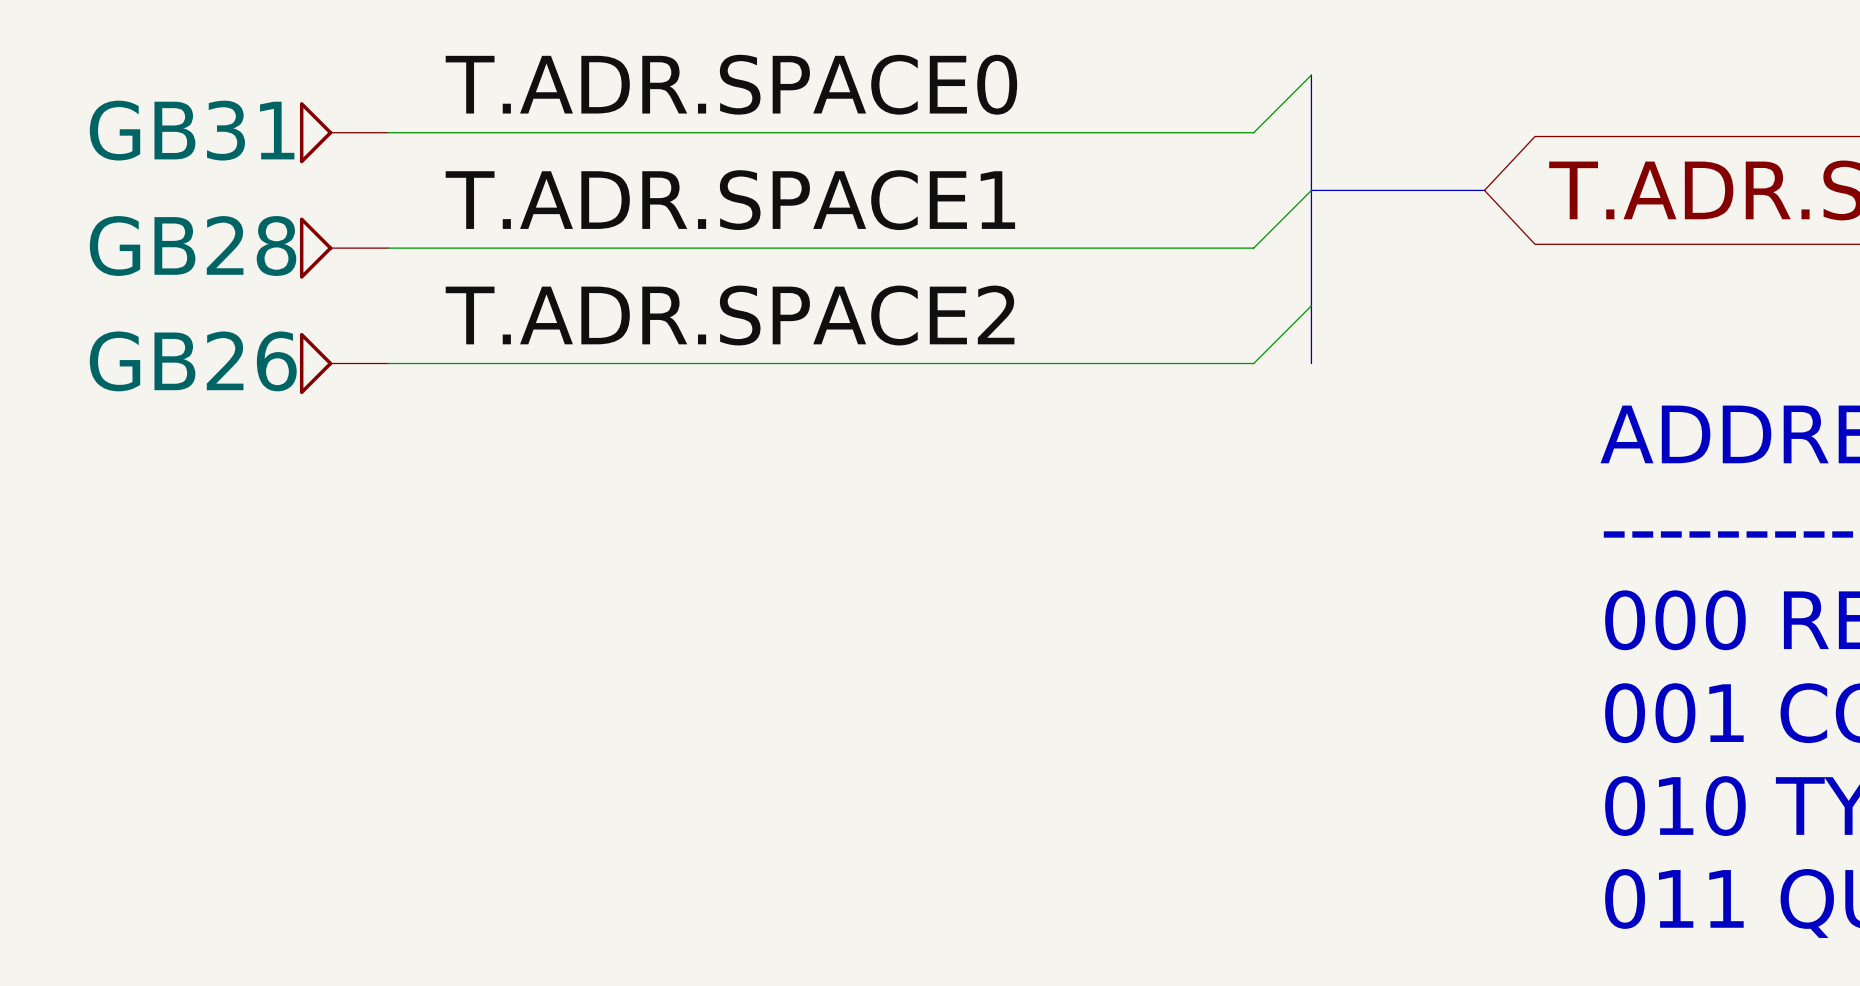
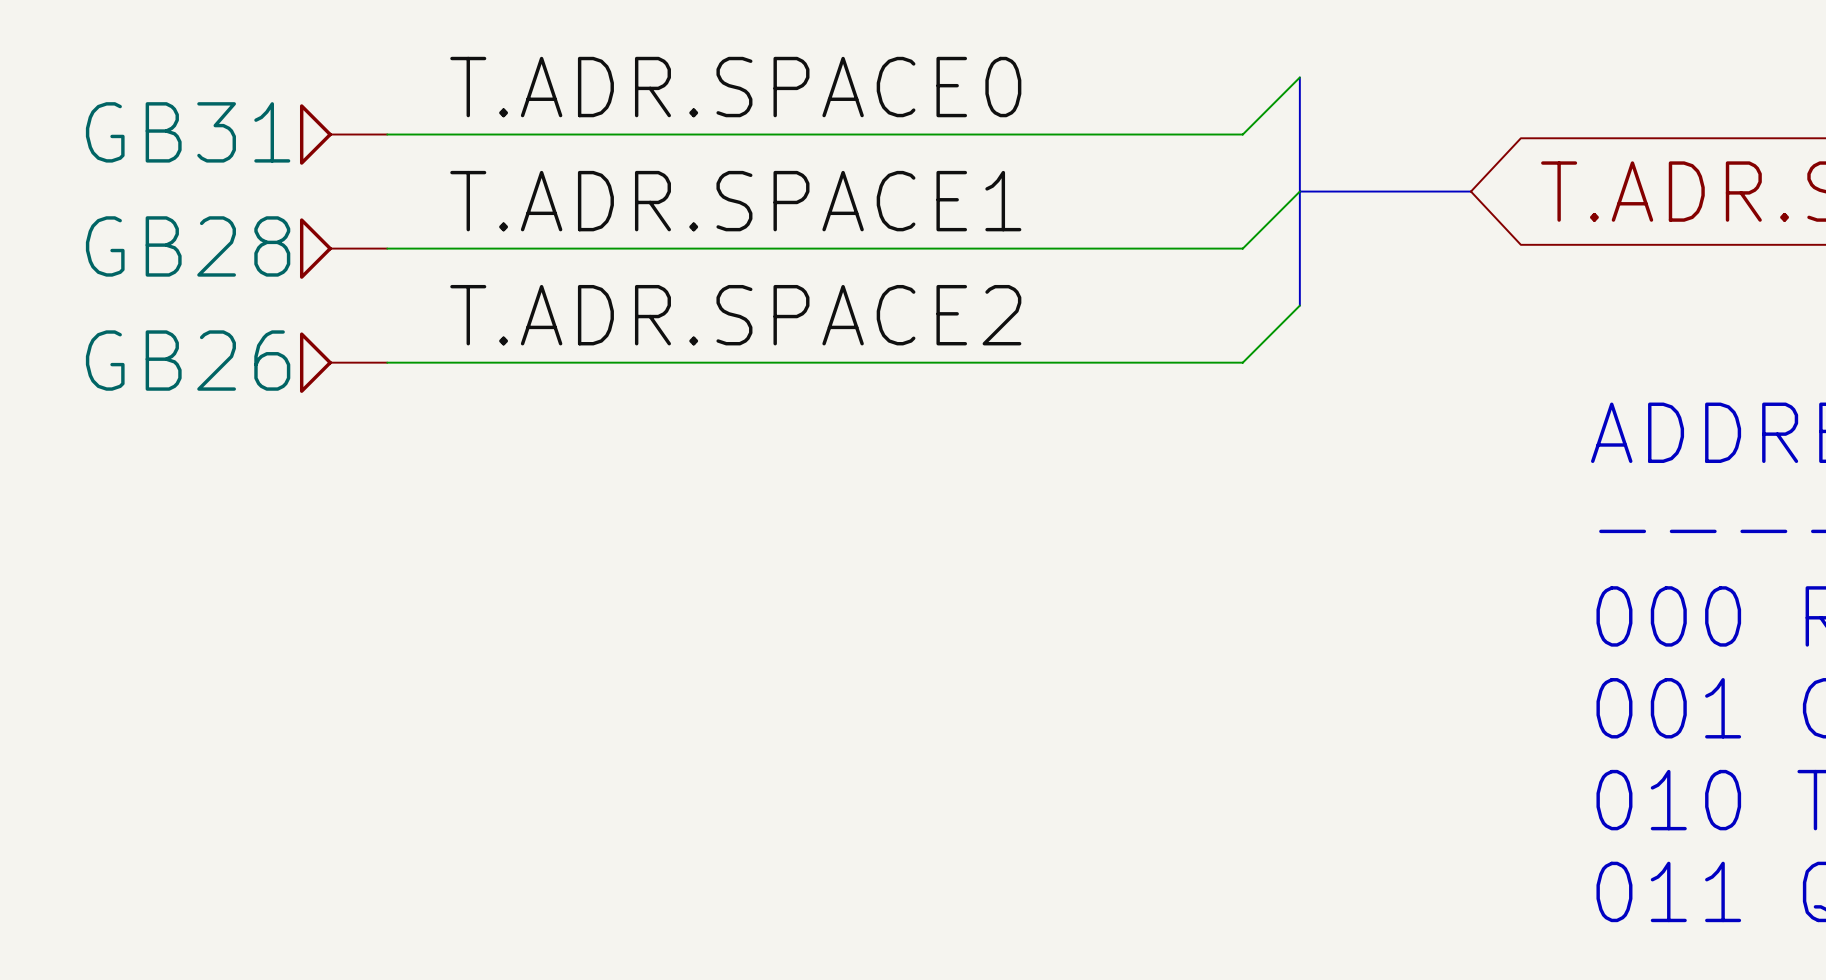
bus: (1311, 305) (1311, 363) -> none

